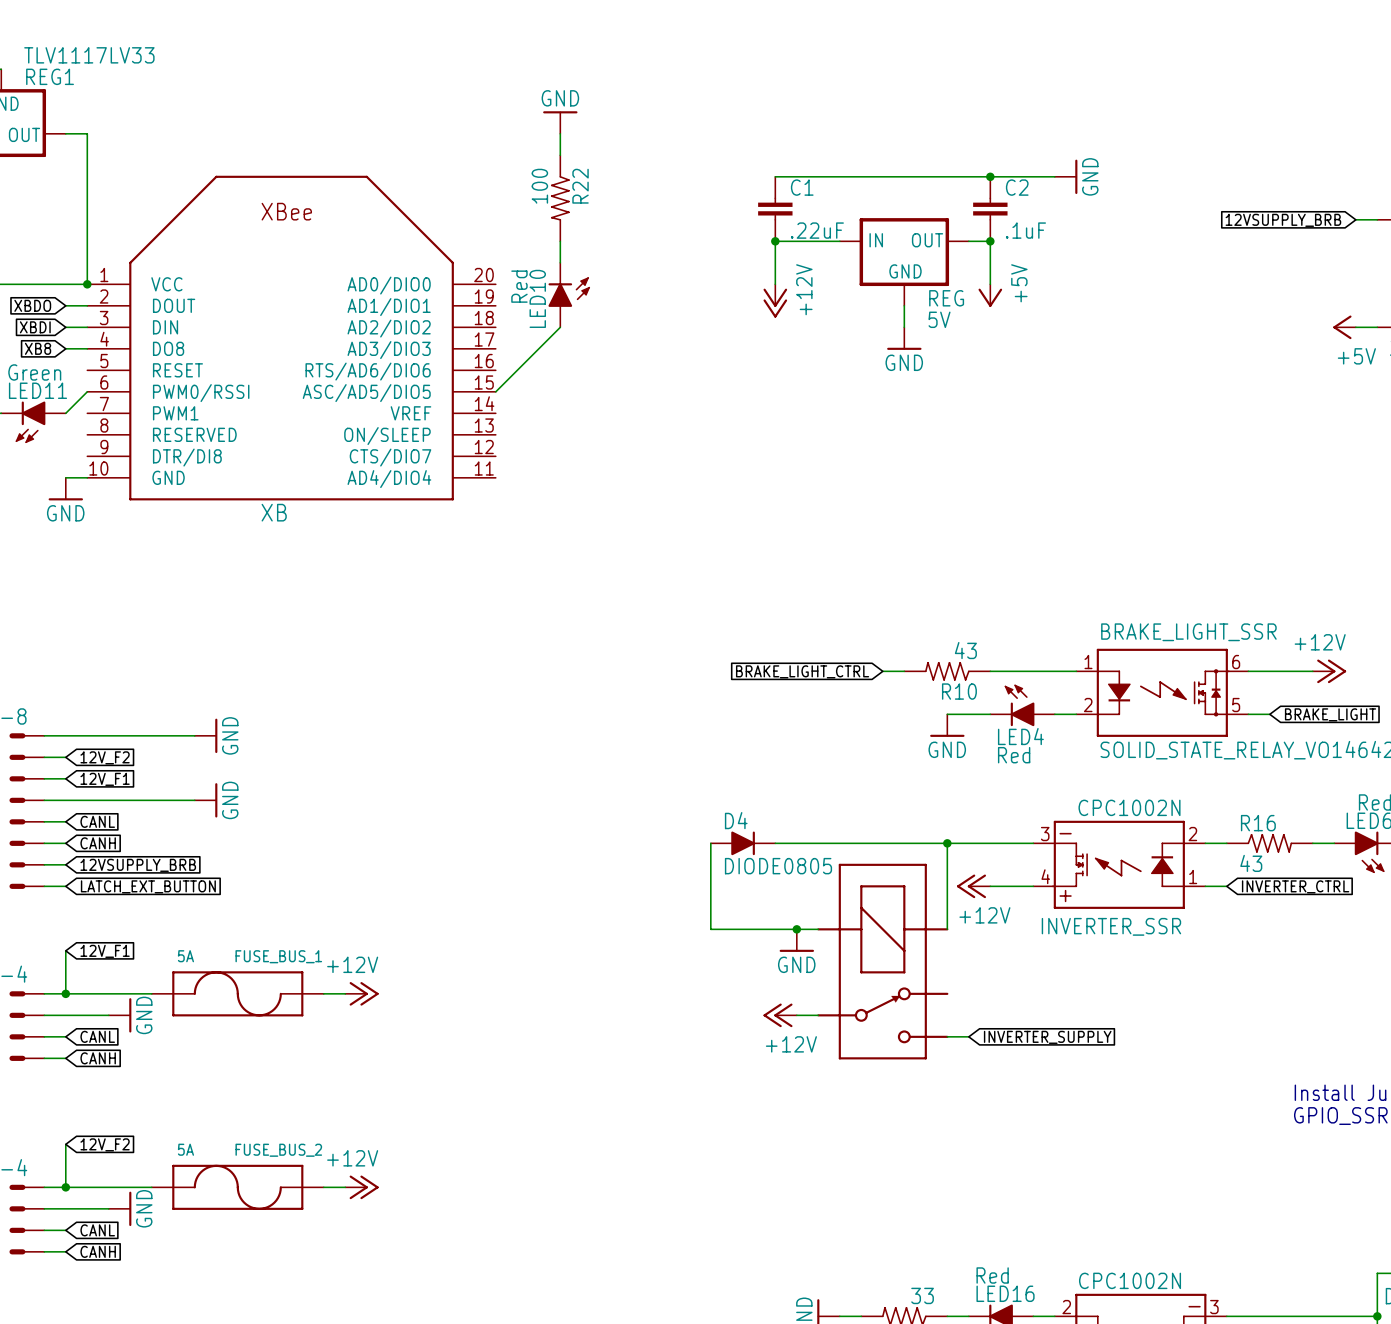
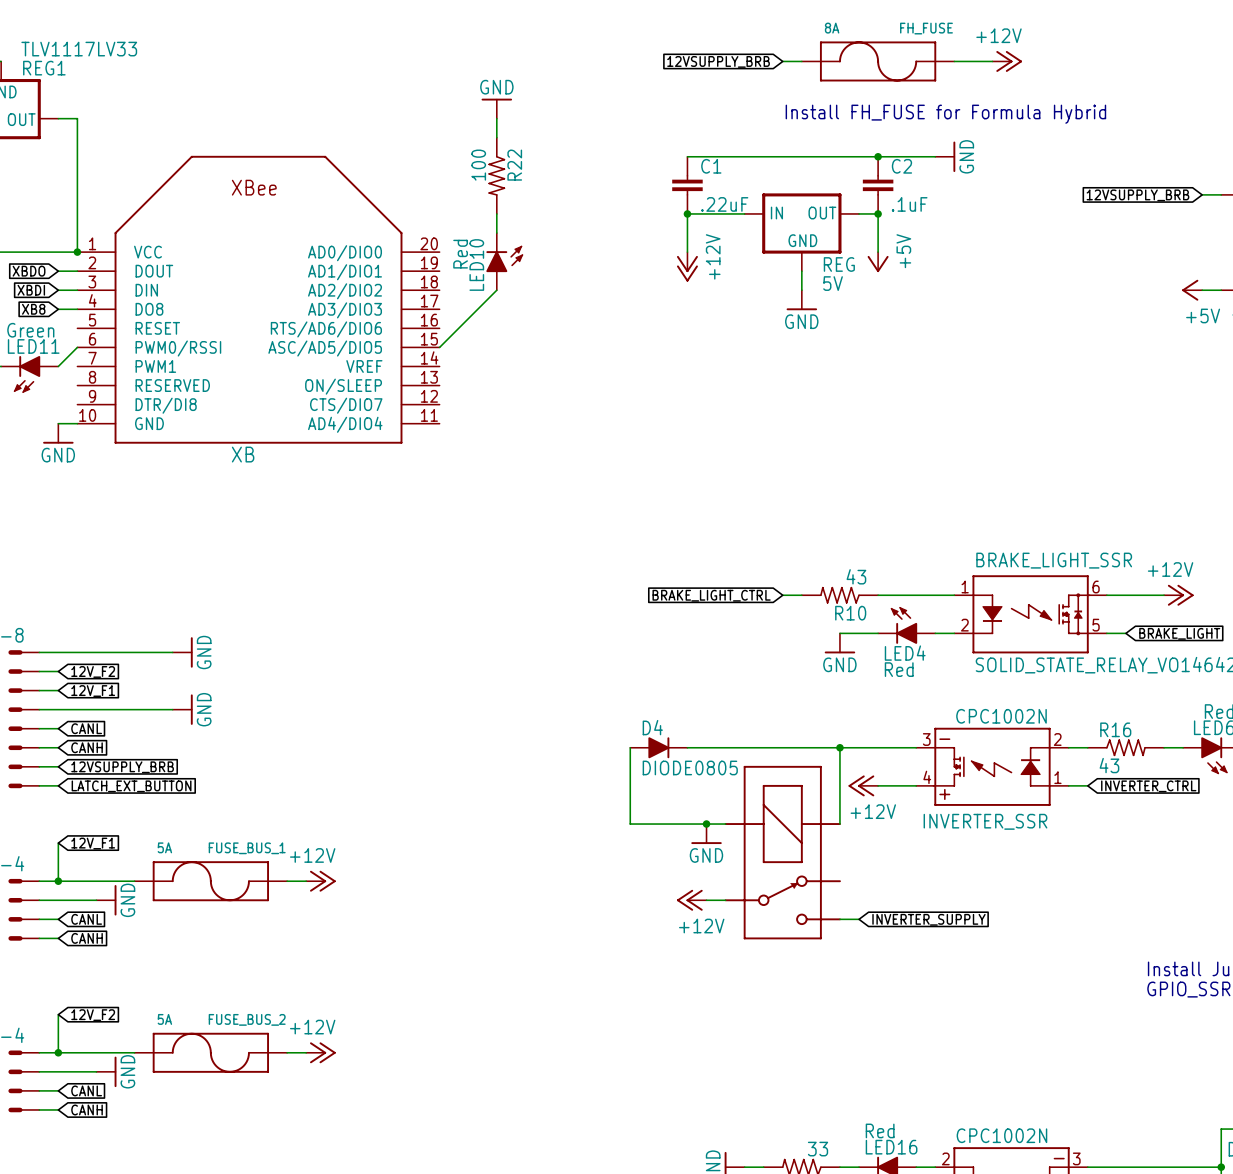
global label: none -> 12VSUPPLY_BRB (718, 61)
wire: none -> (782, 61) (801, 61)
FH_FUSE: none -> 8A (878, 61)
wire: none -> (954, 61) (992, 61)
power symbol: none -> +12V (1007, 61)
text: none -> Install FH_FUSE for Formula Hybrid (945, 114)

